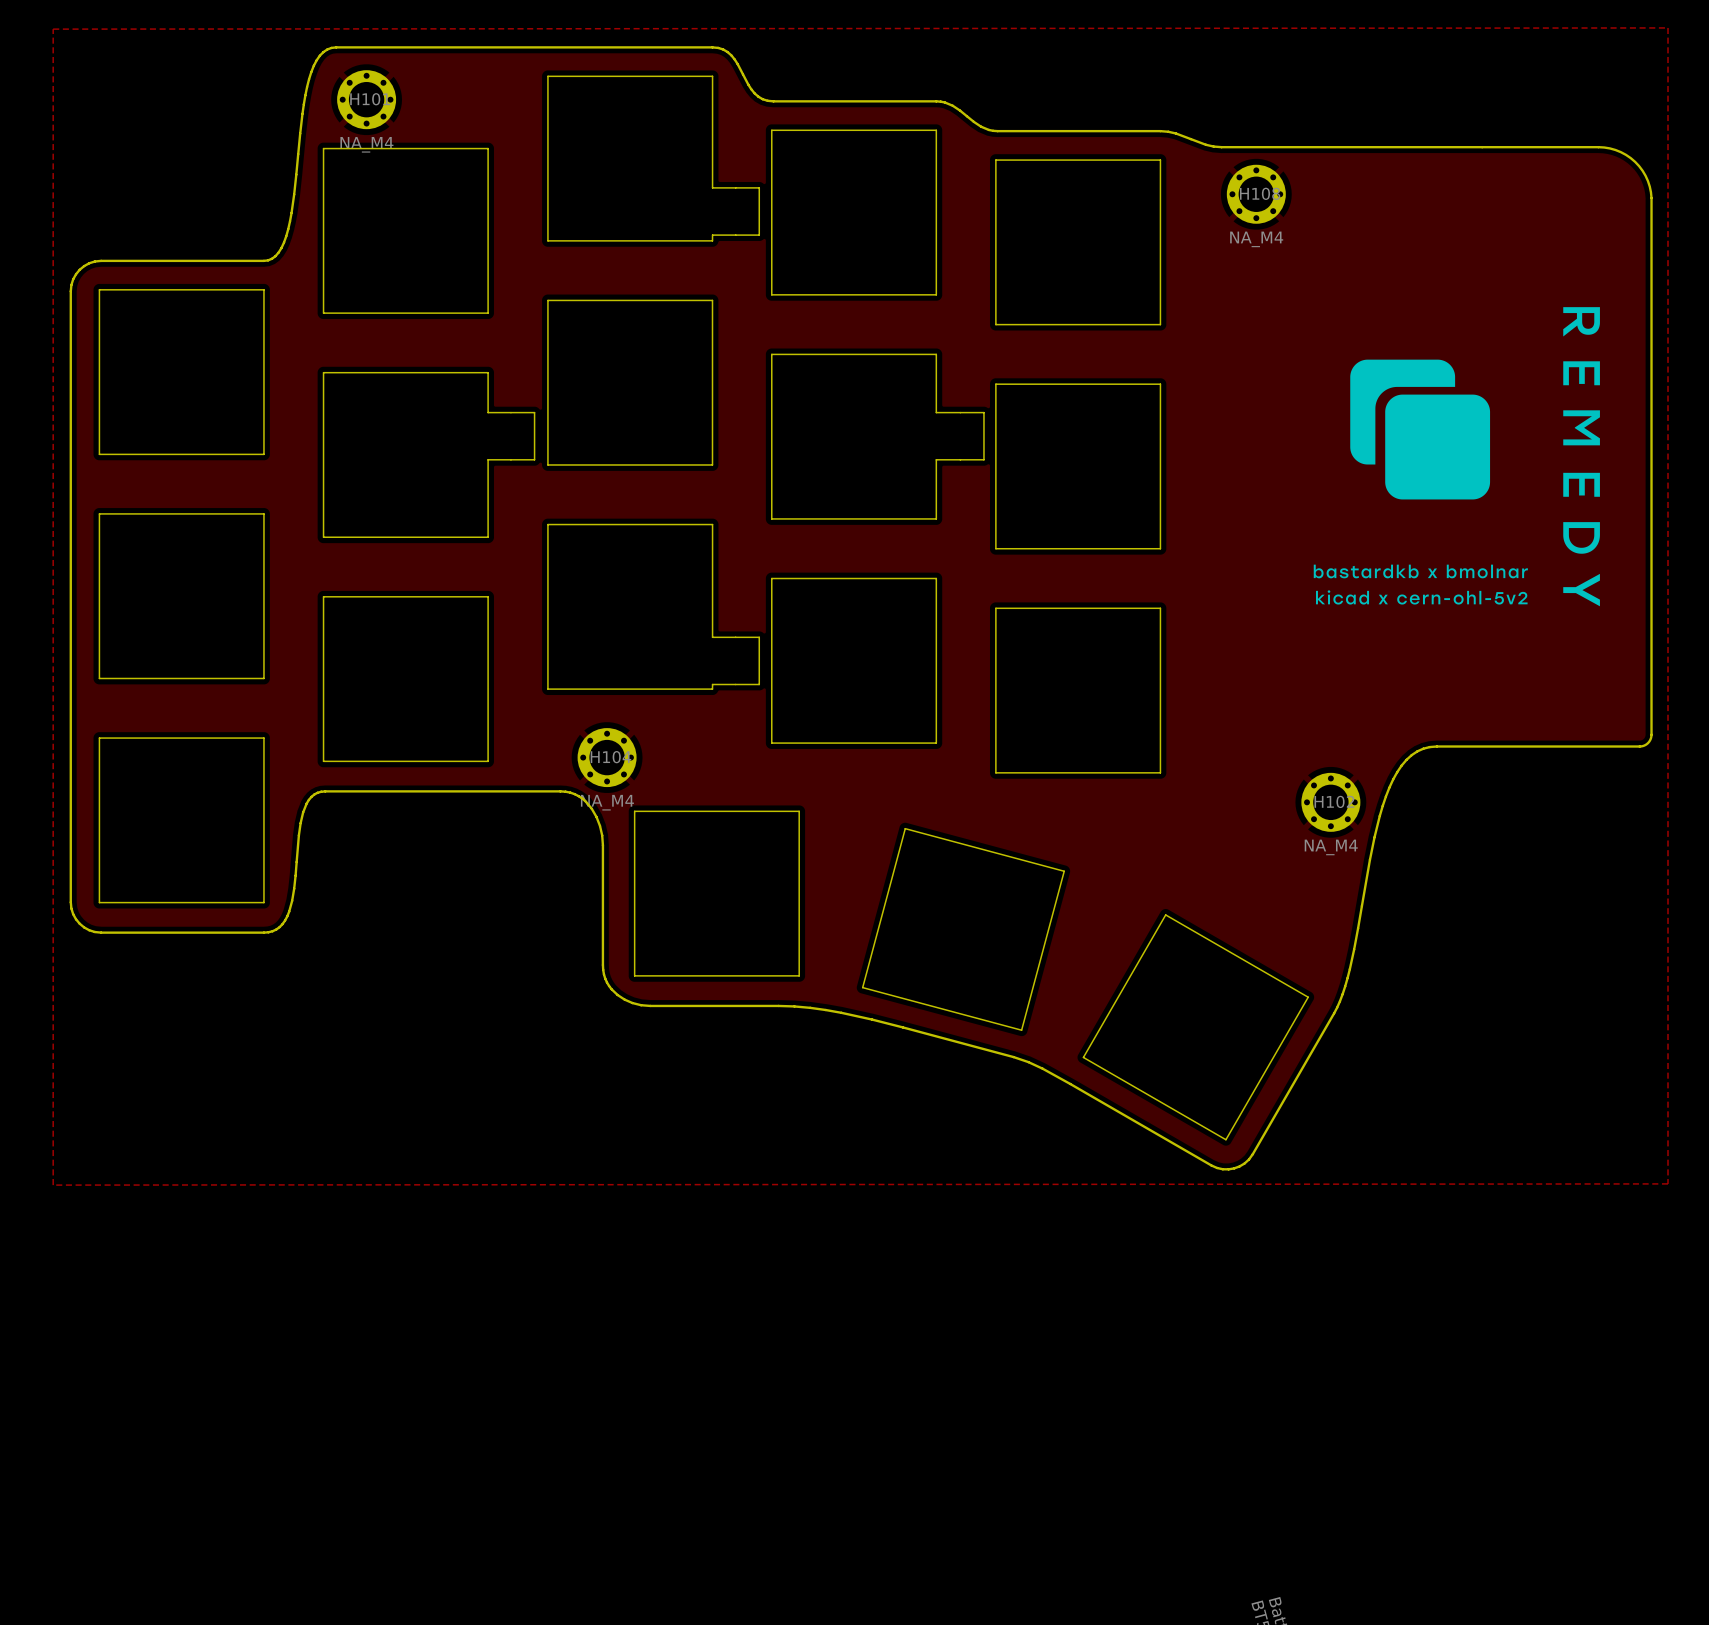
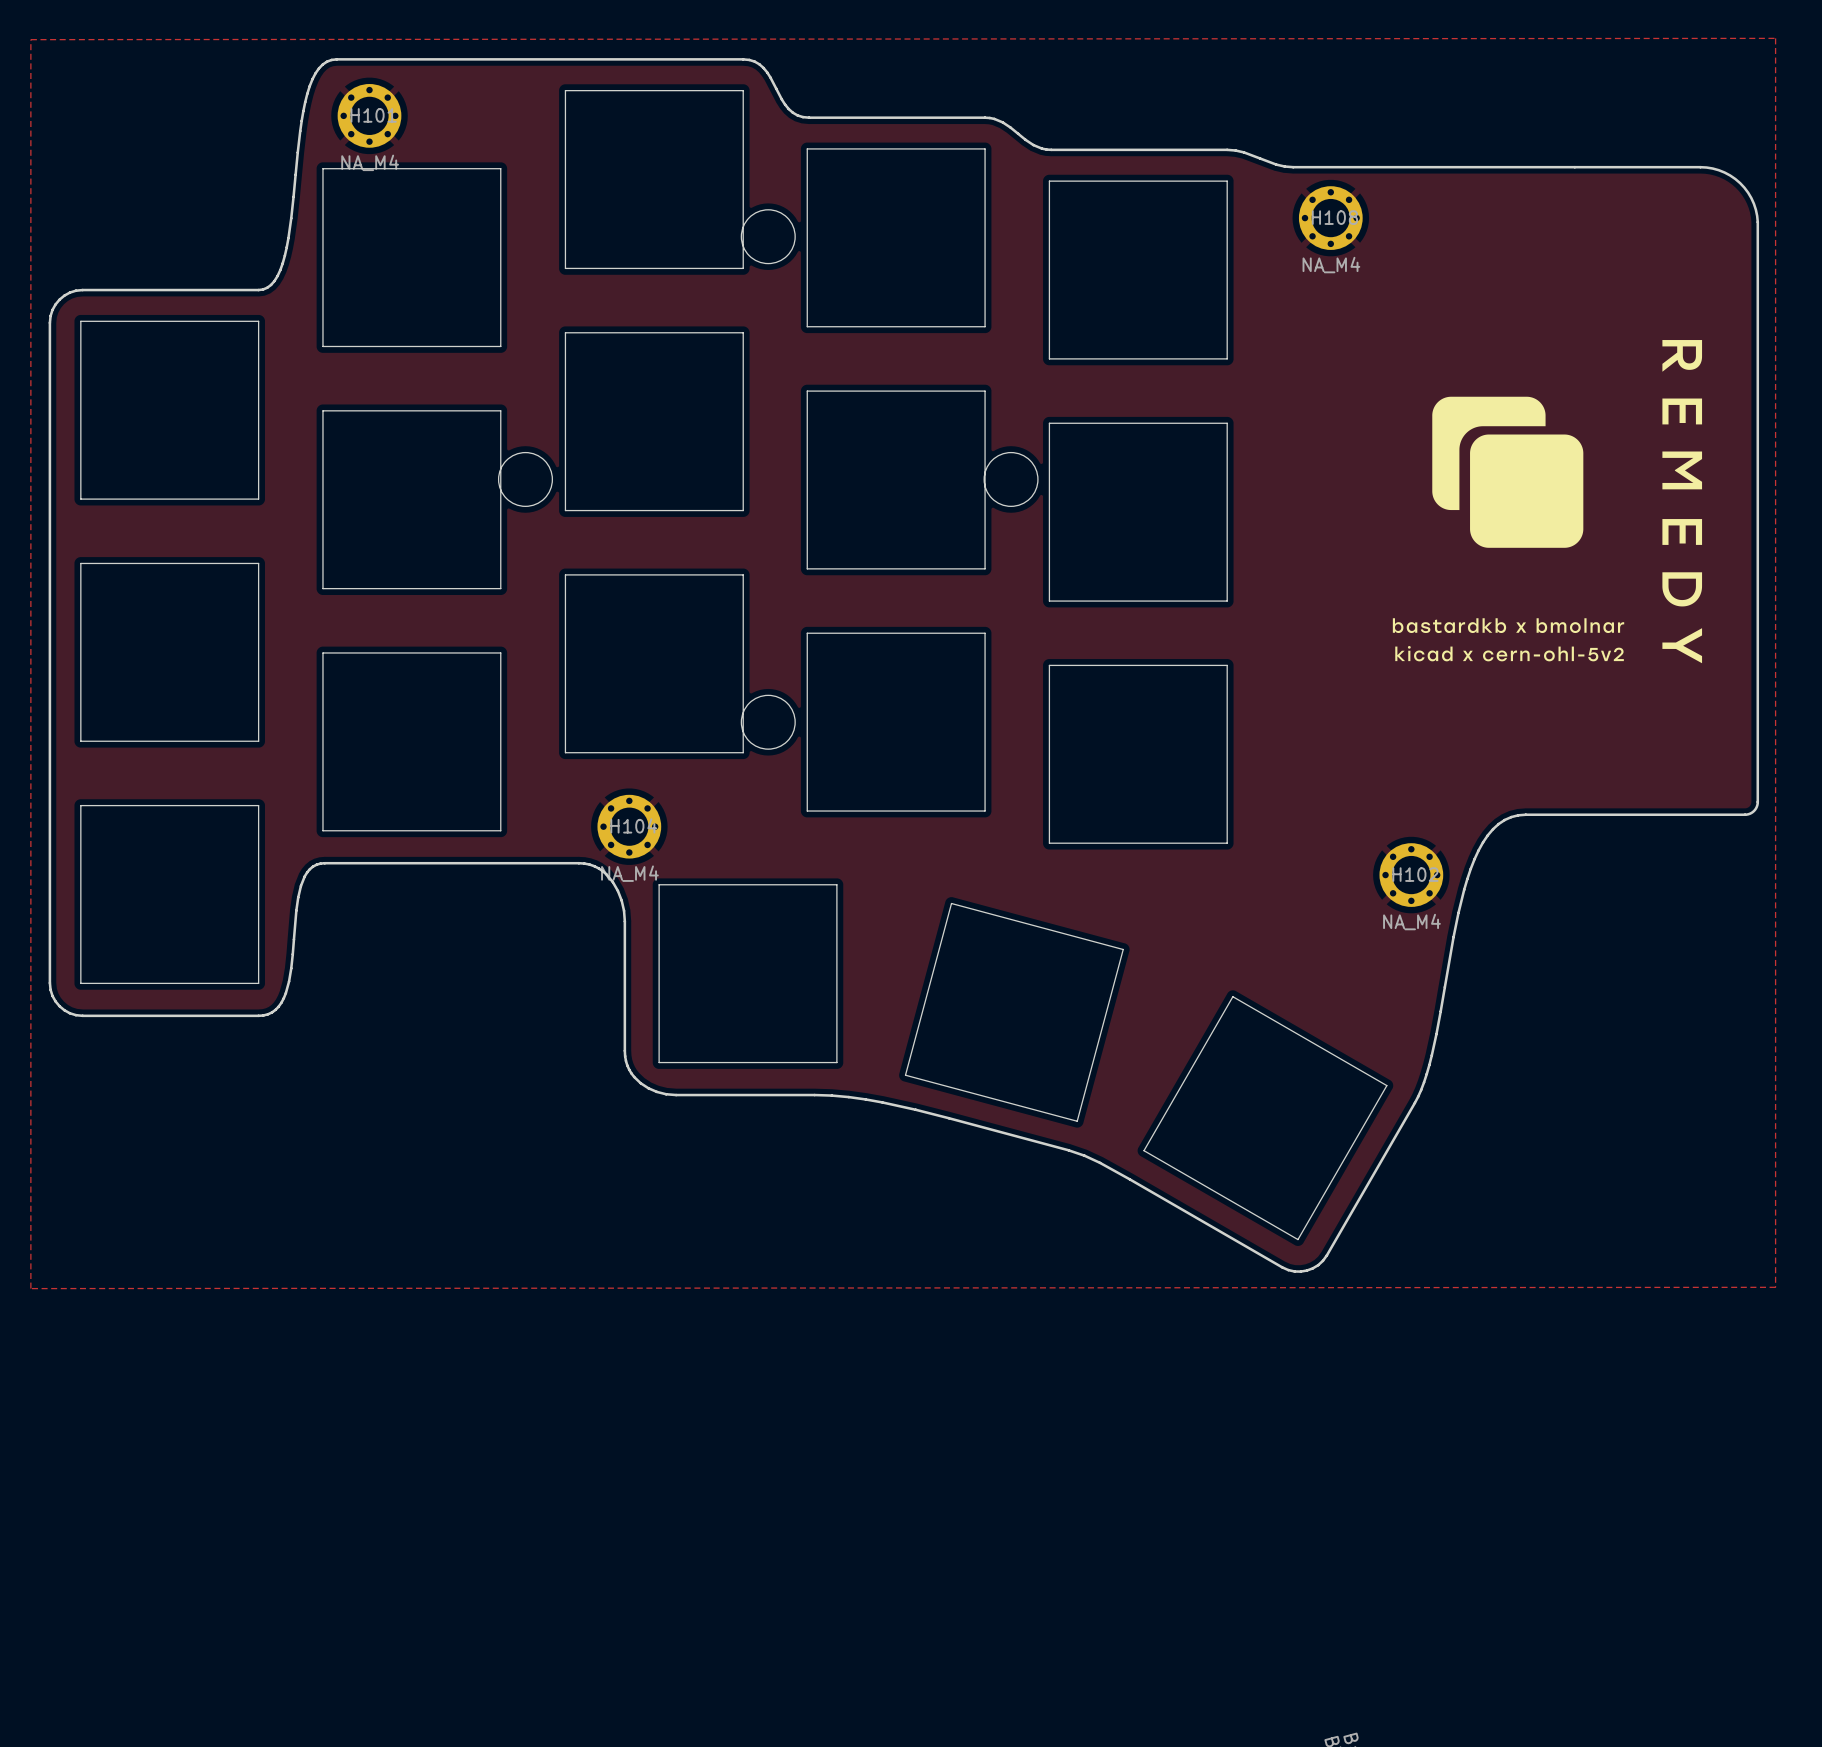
drawing: none -> [322, 90, 1039, 754]
board edge: (547, 76) (547, 240) (712, 240) (712, 235) (759, 235) (759, 187) (712, 187) (712, 76) (547, 76) -> none
board edge: (771, 354) (936, 354) (936, 412) (983, 412) (983, 459) (936, 459) (936, 518) (771, 518) (771, 354) -> none
board edge: (323, 372) (488, 372) (488, 412) (534, 412) (534, 459) (488, 459) (488, 537) (323, 537) (323, 372) -> none
board edge: (547, 524) (712, 524) (712, 637) (759, 637) (759, 684) (712, 684) (712, 689) (547, 689) (547, 524) -> none

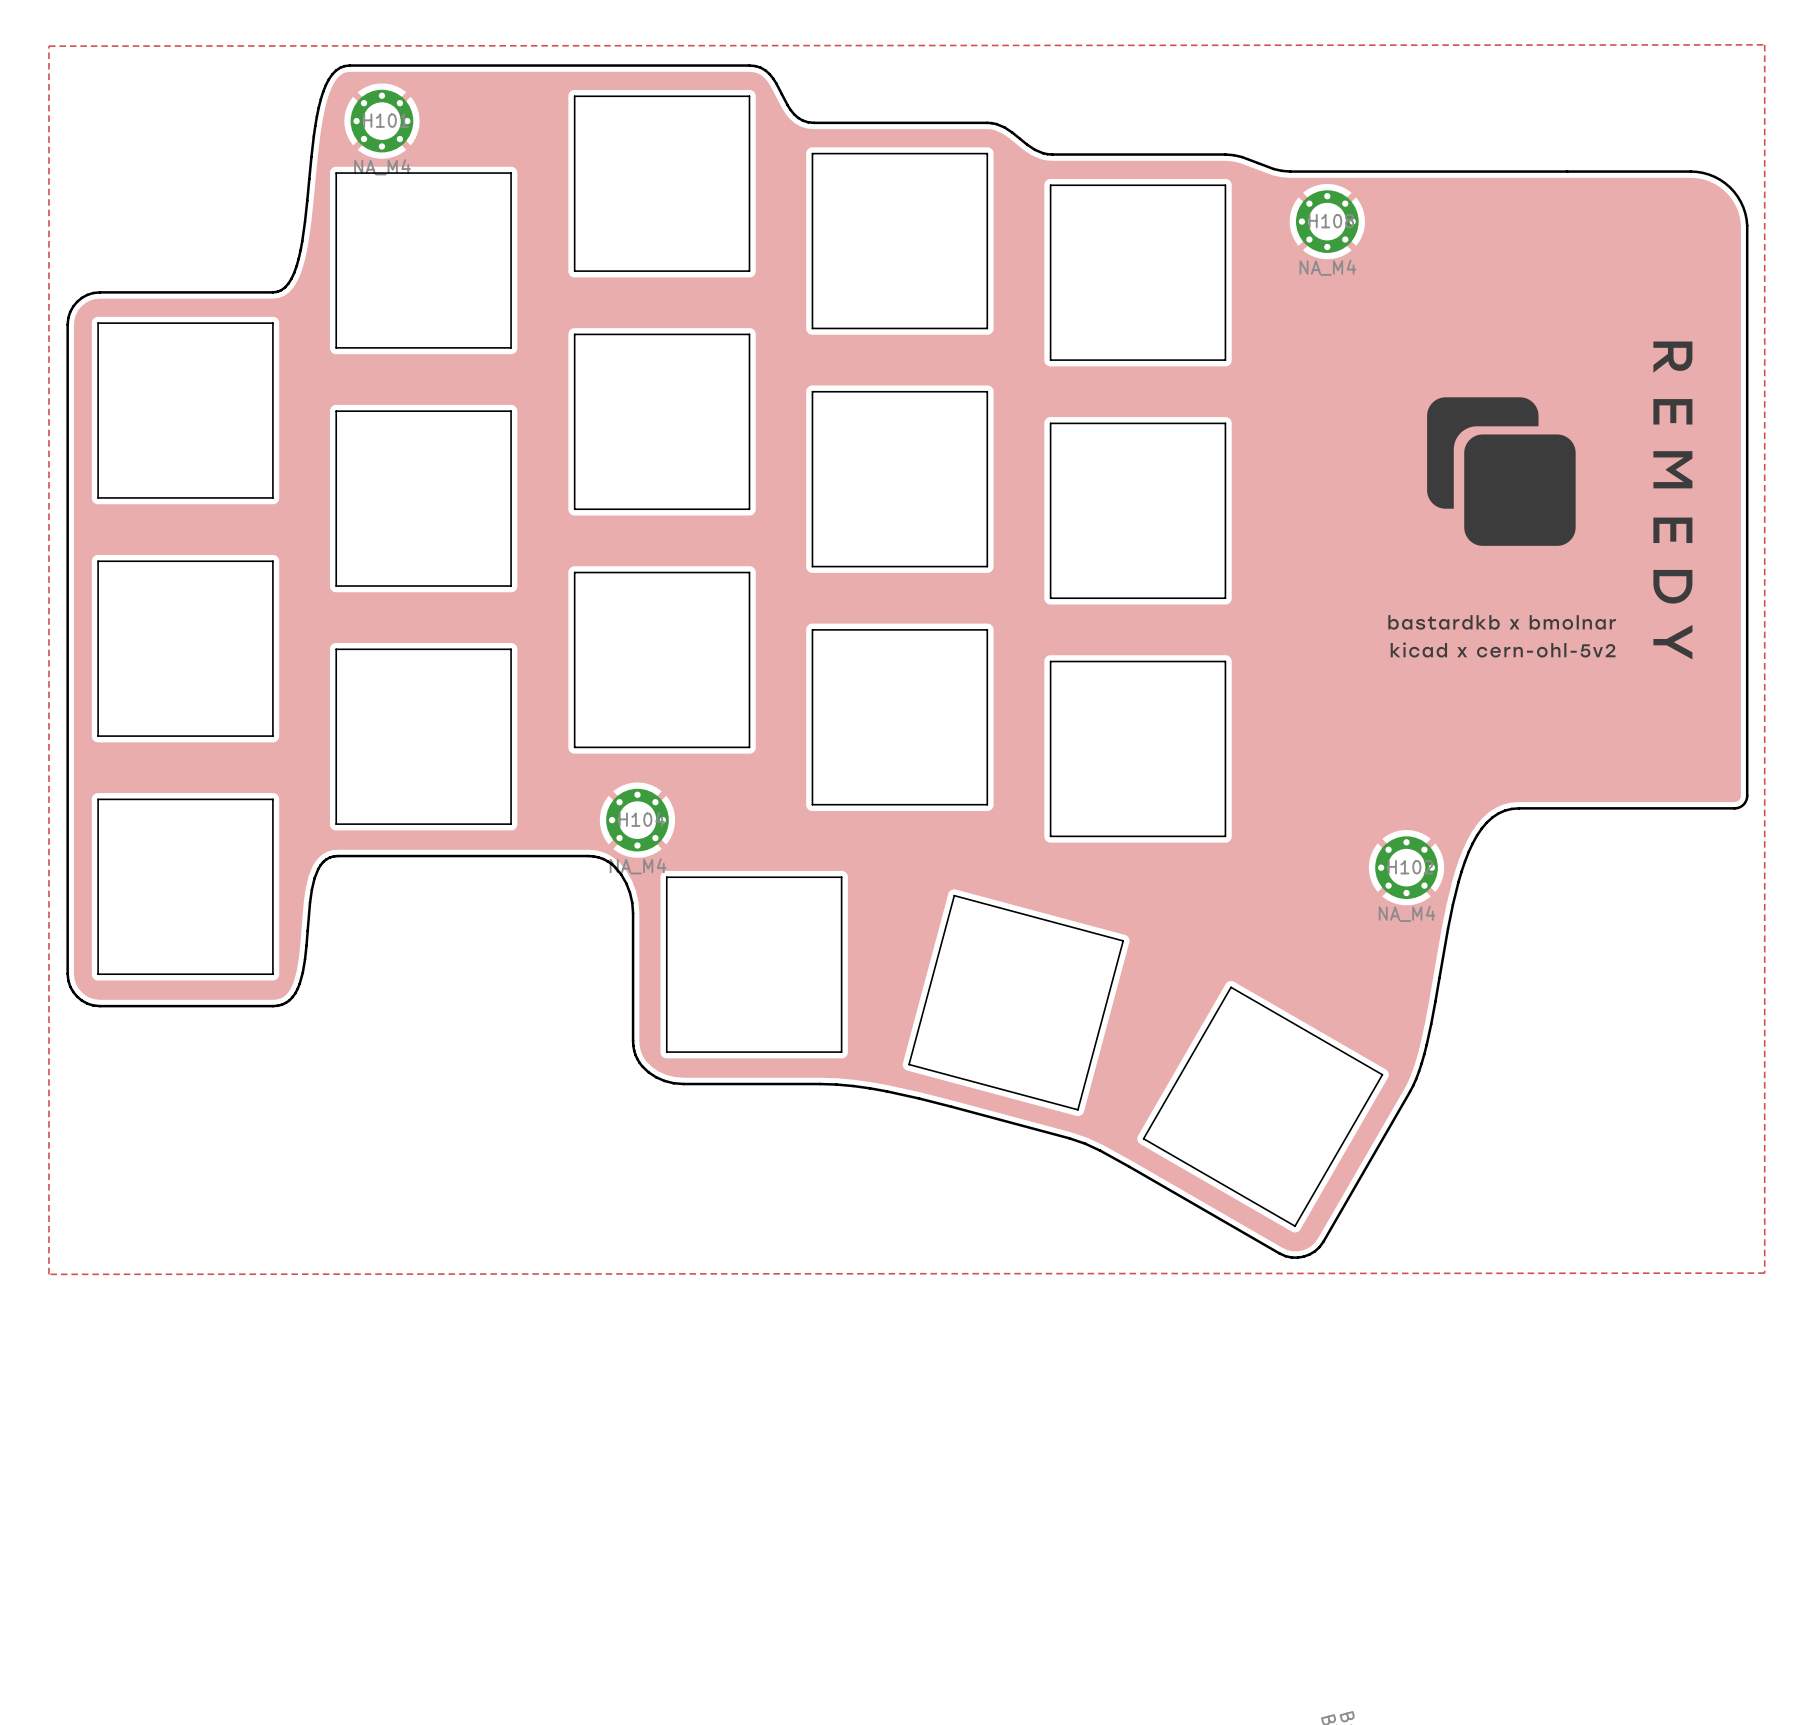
drawing: [498, 209, 1039, 750] -> none

